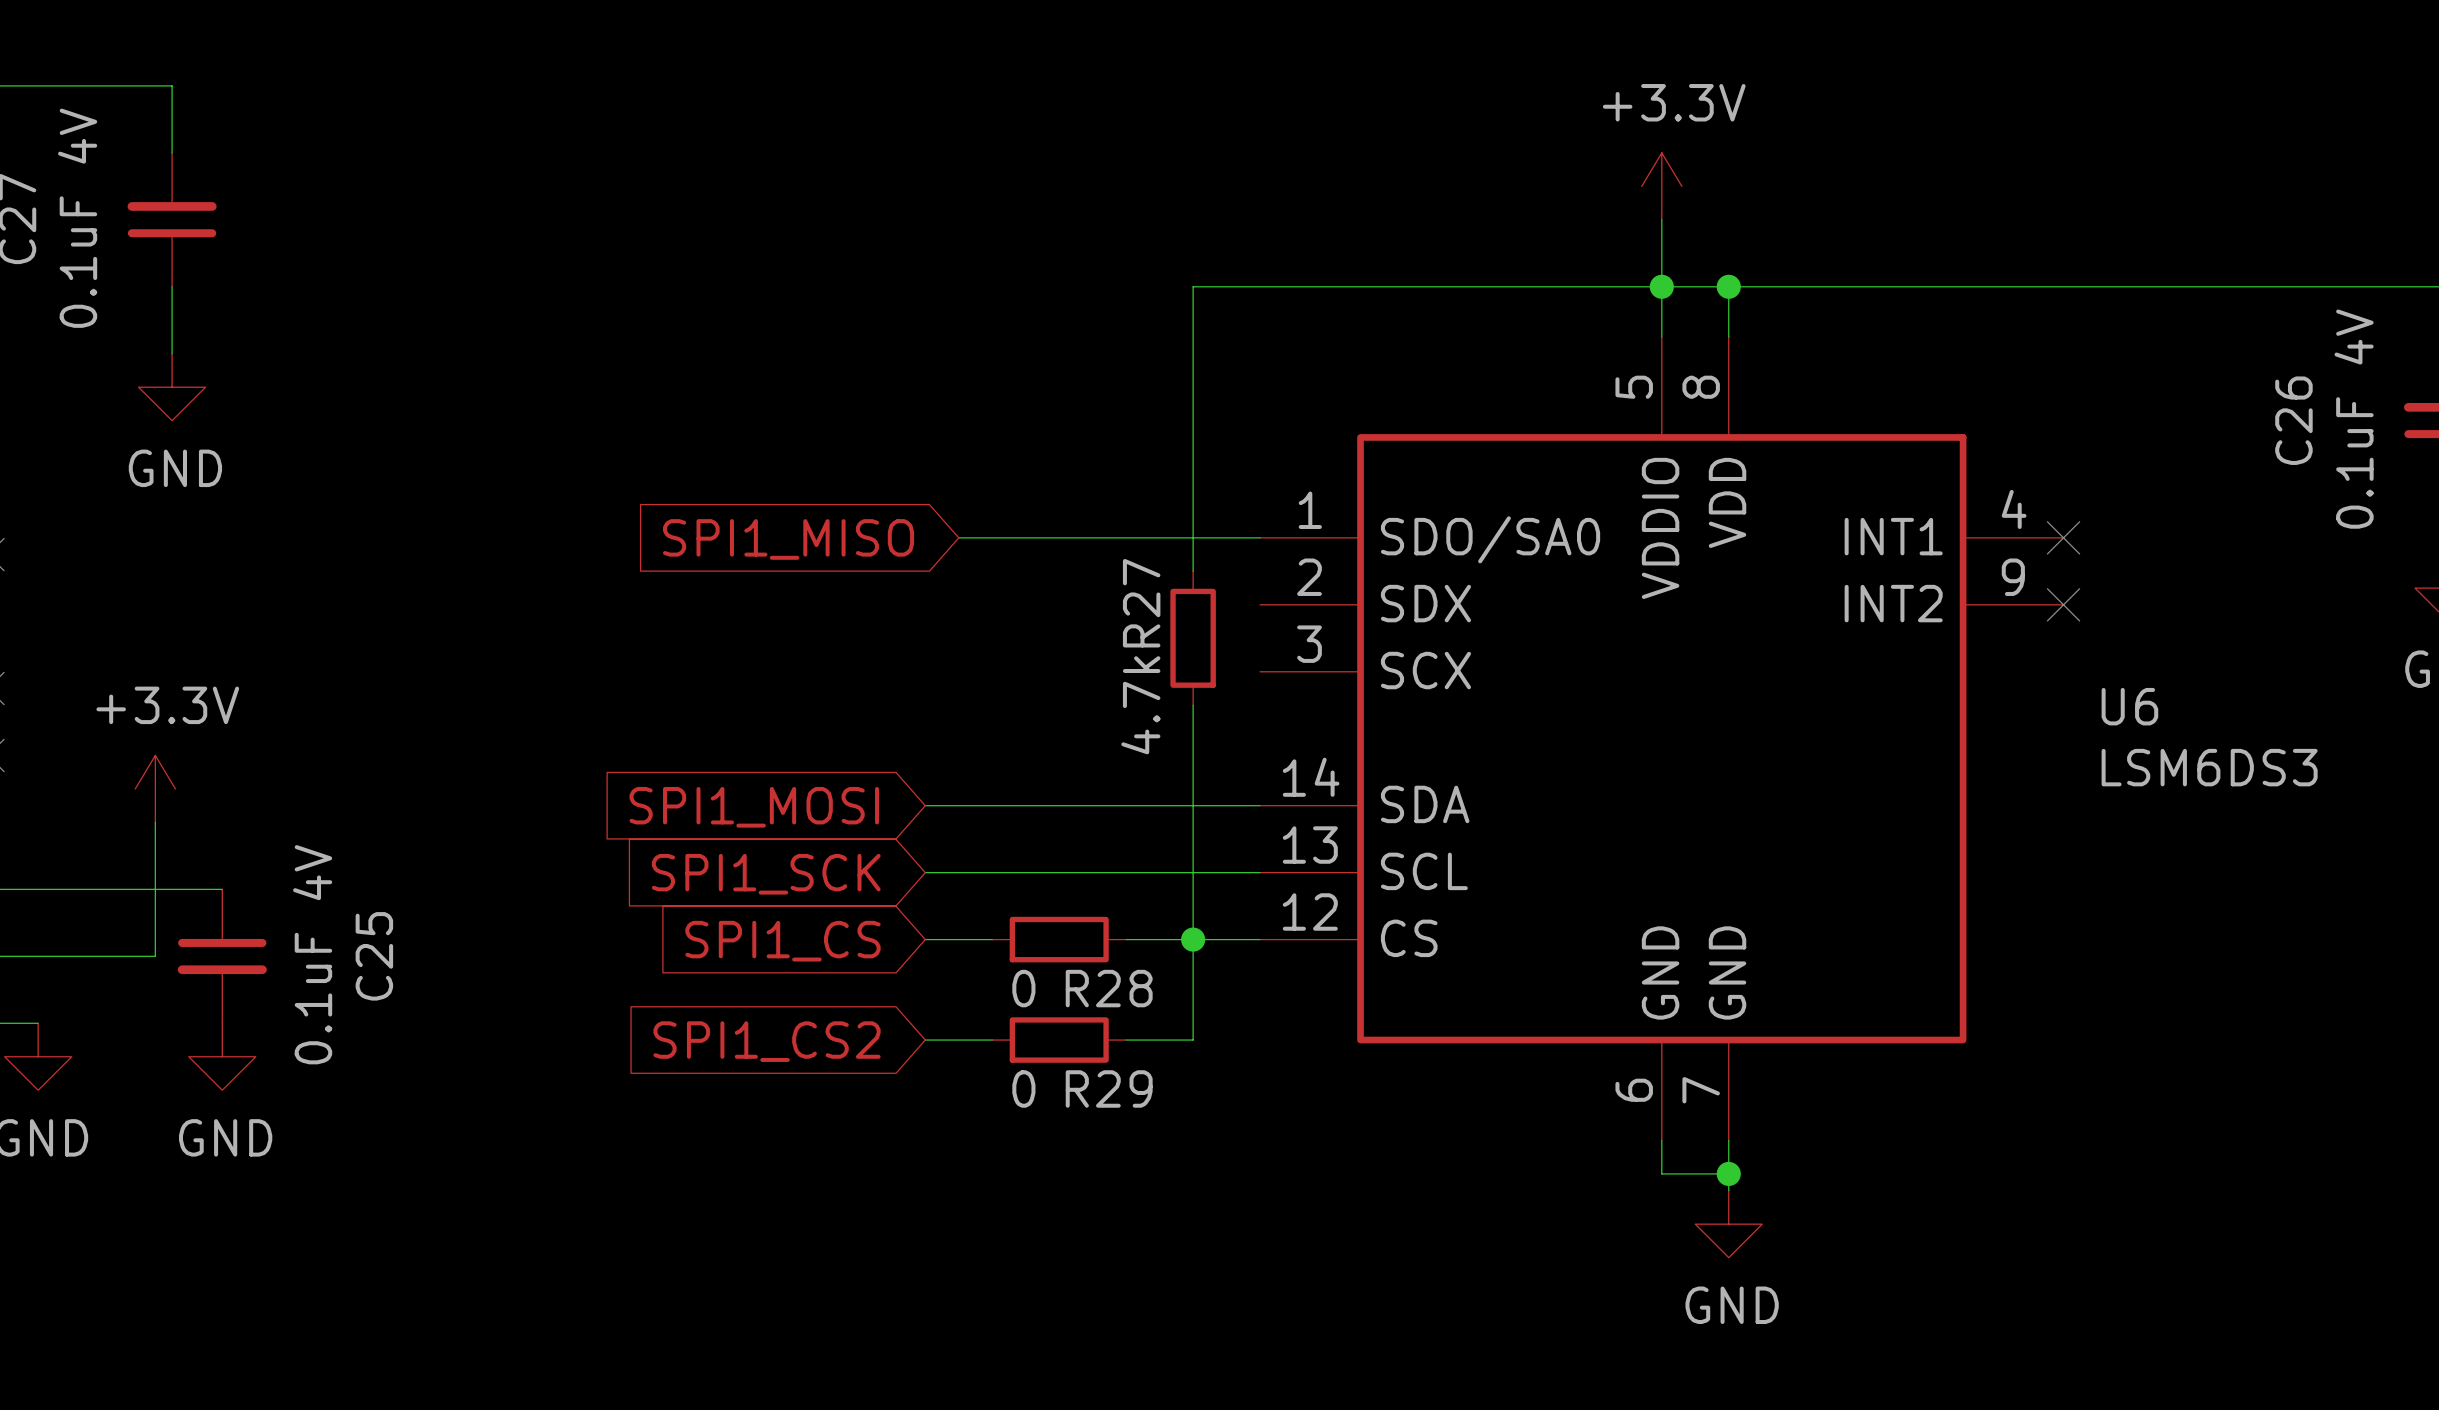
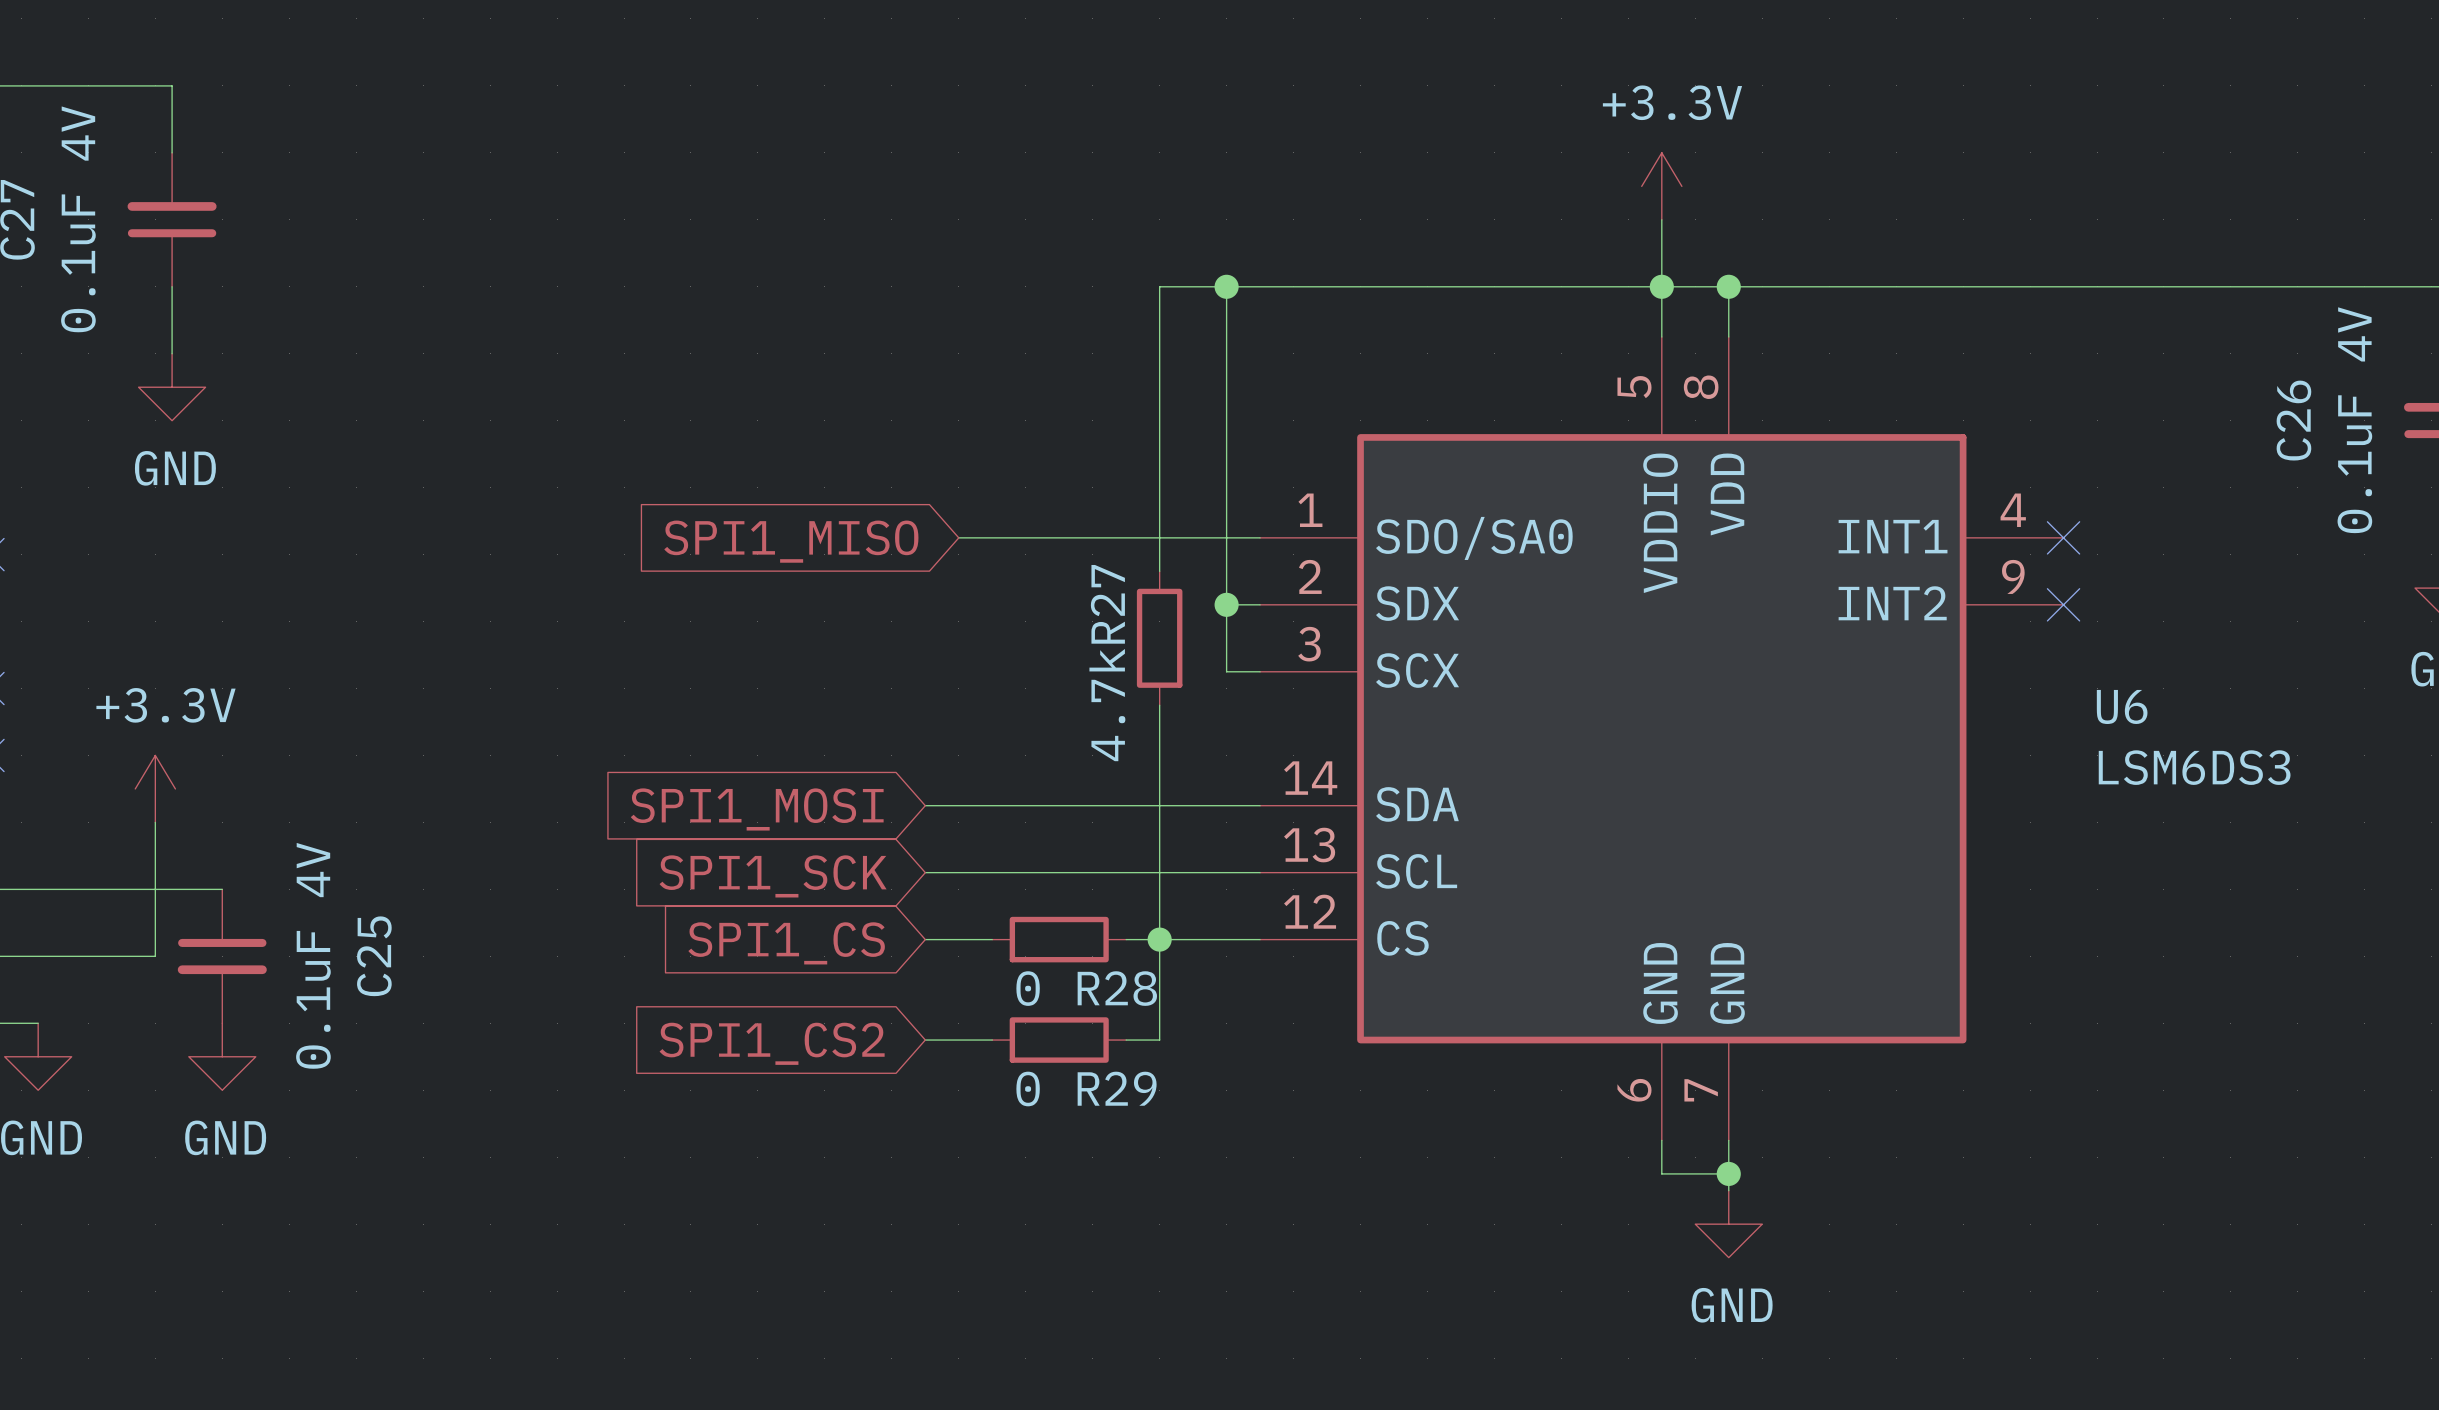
wire: (1193, 286) (1193, 571) -> (1193, 286) (1159, 286) (1159, 571)
wire: none -> (1226, 286) (1226, 671) (1260, 671)
junction: none -> (1226, 286)
wire: none -> (1226, 604) (1260, 604)
junction: none -> (1226, 604)
R27 position: (1193, 638) -> (1159, 638)
wire: (1193, 705) (1193, 1040) (1159, 1040) -> (1159, 705) (1159, 1040)
junction position: (1193, 939) -> (1159, 939)

